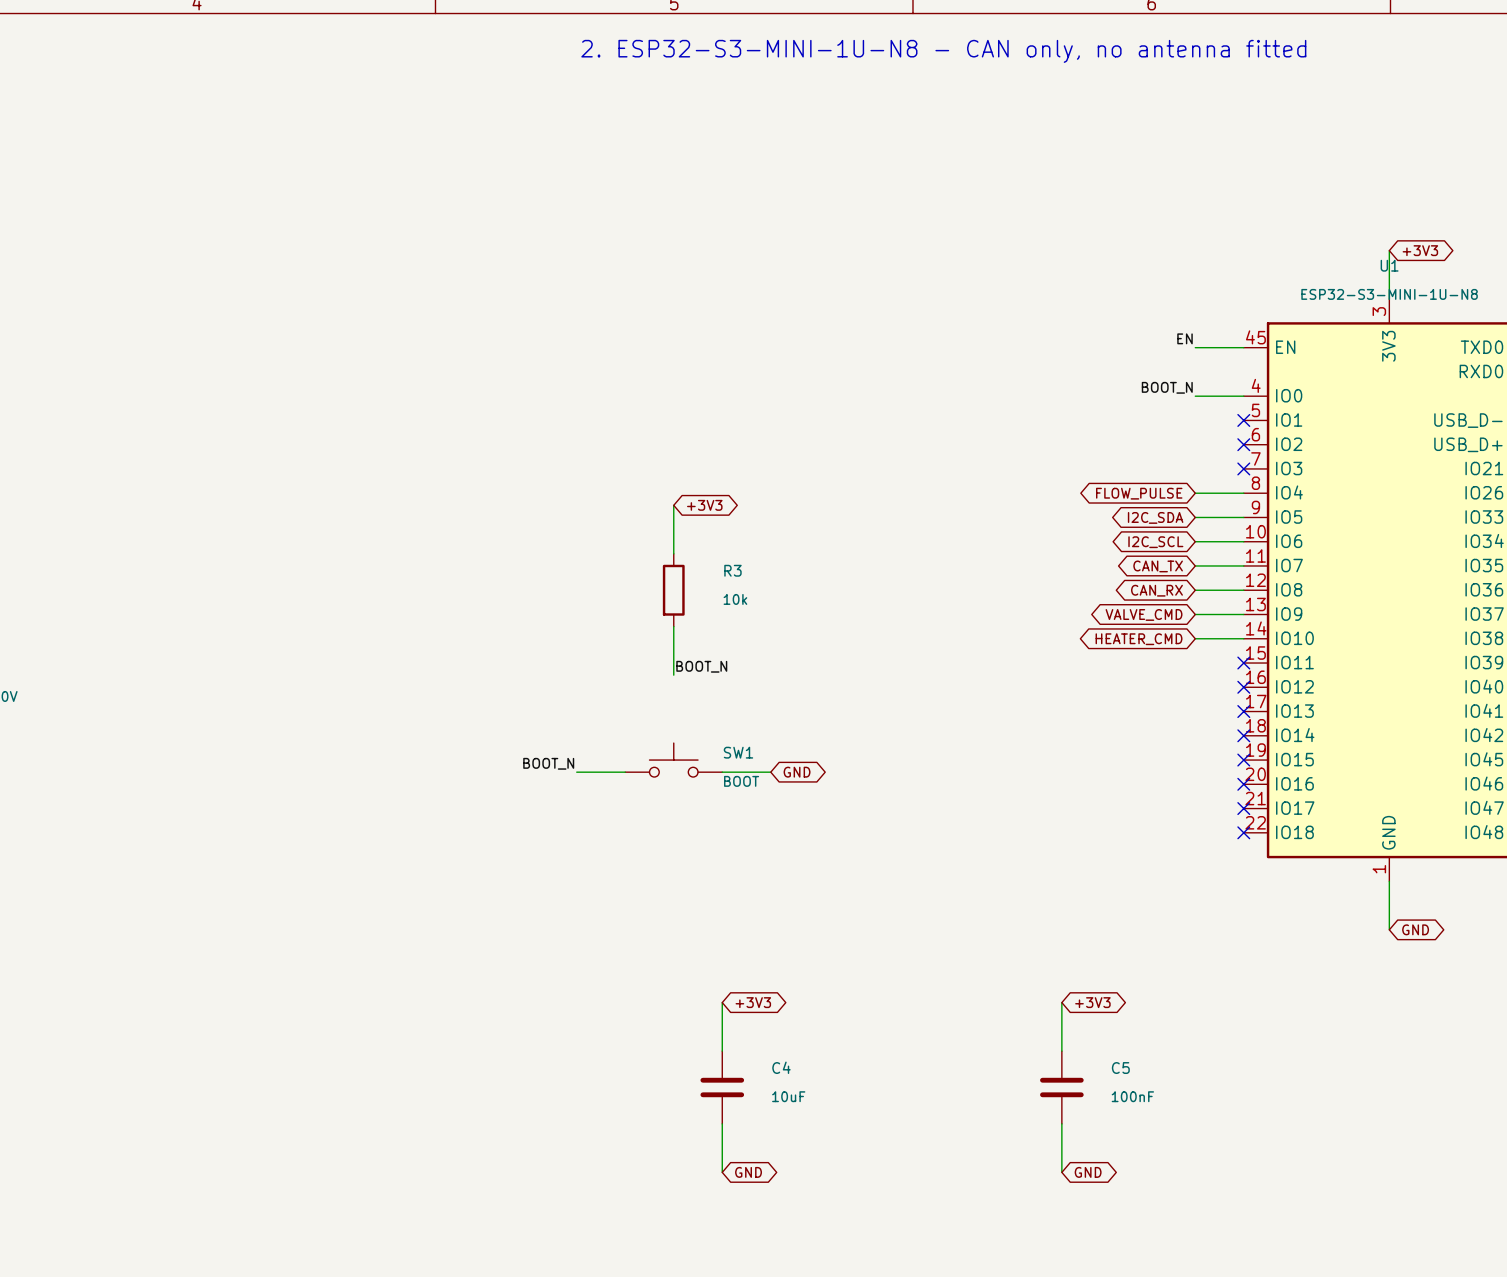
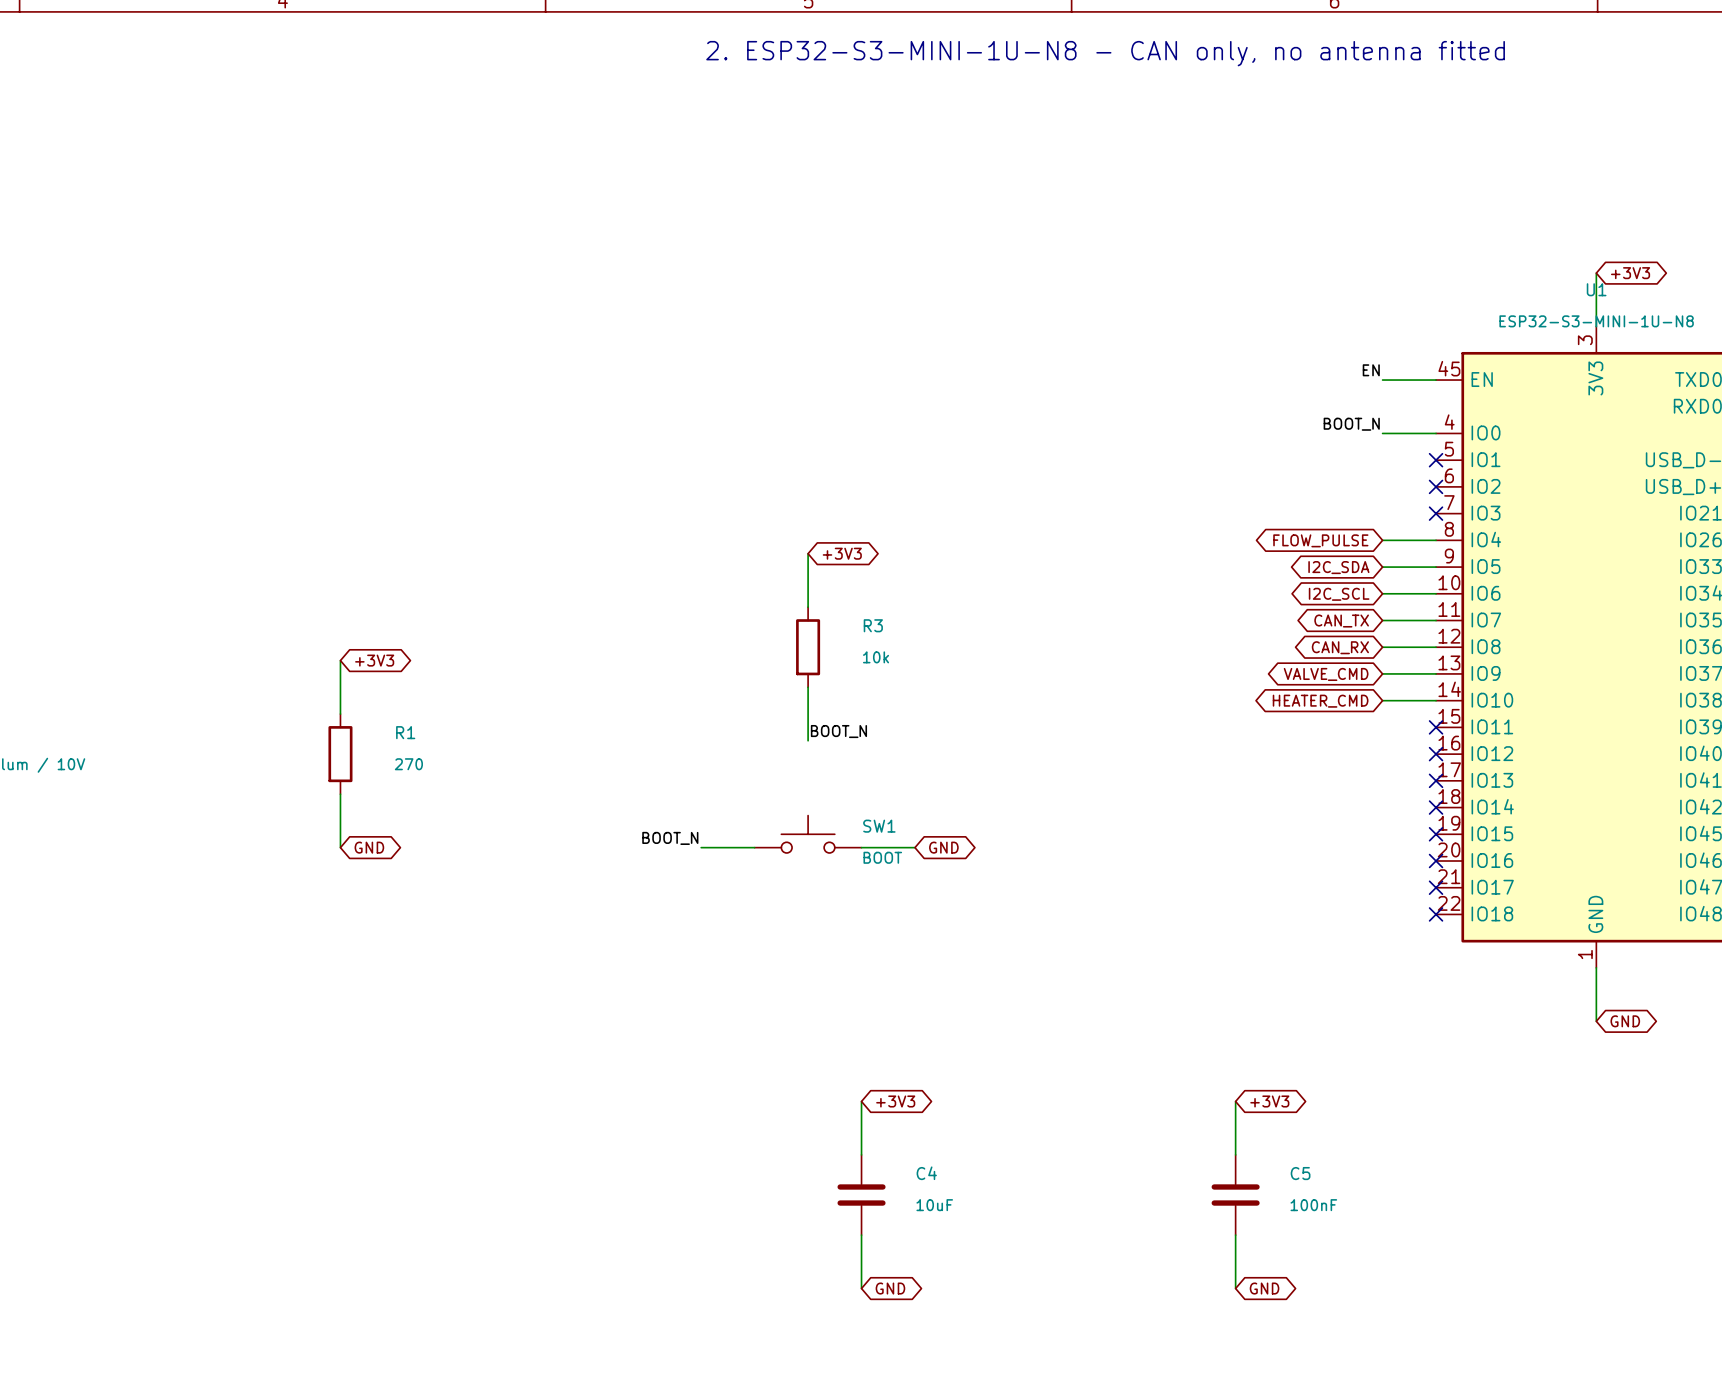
wire: none -> (340, 660) (340, 714)
global label: none -> +3V3 (374, 660)
R1: none -> 270 (340, 754)
wire: none -> (340, 794) (340, 847)
global label: none -> GND (369, 847)

